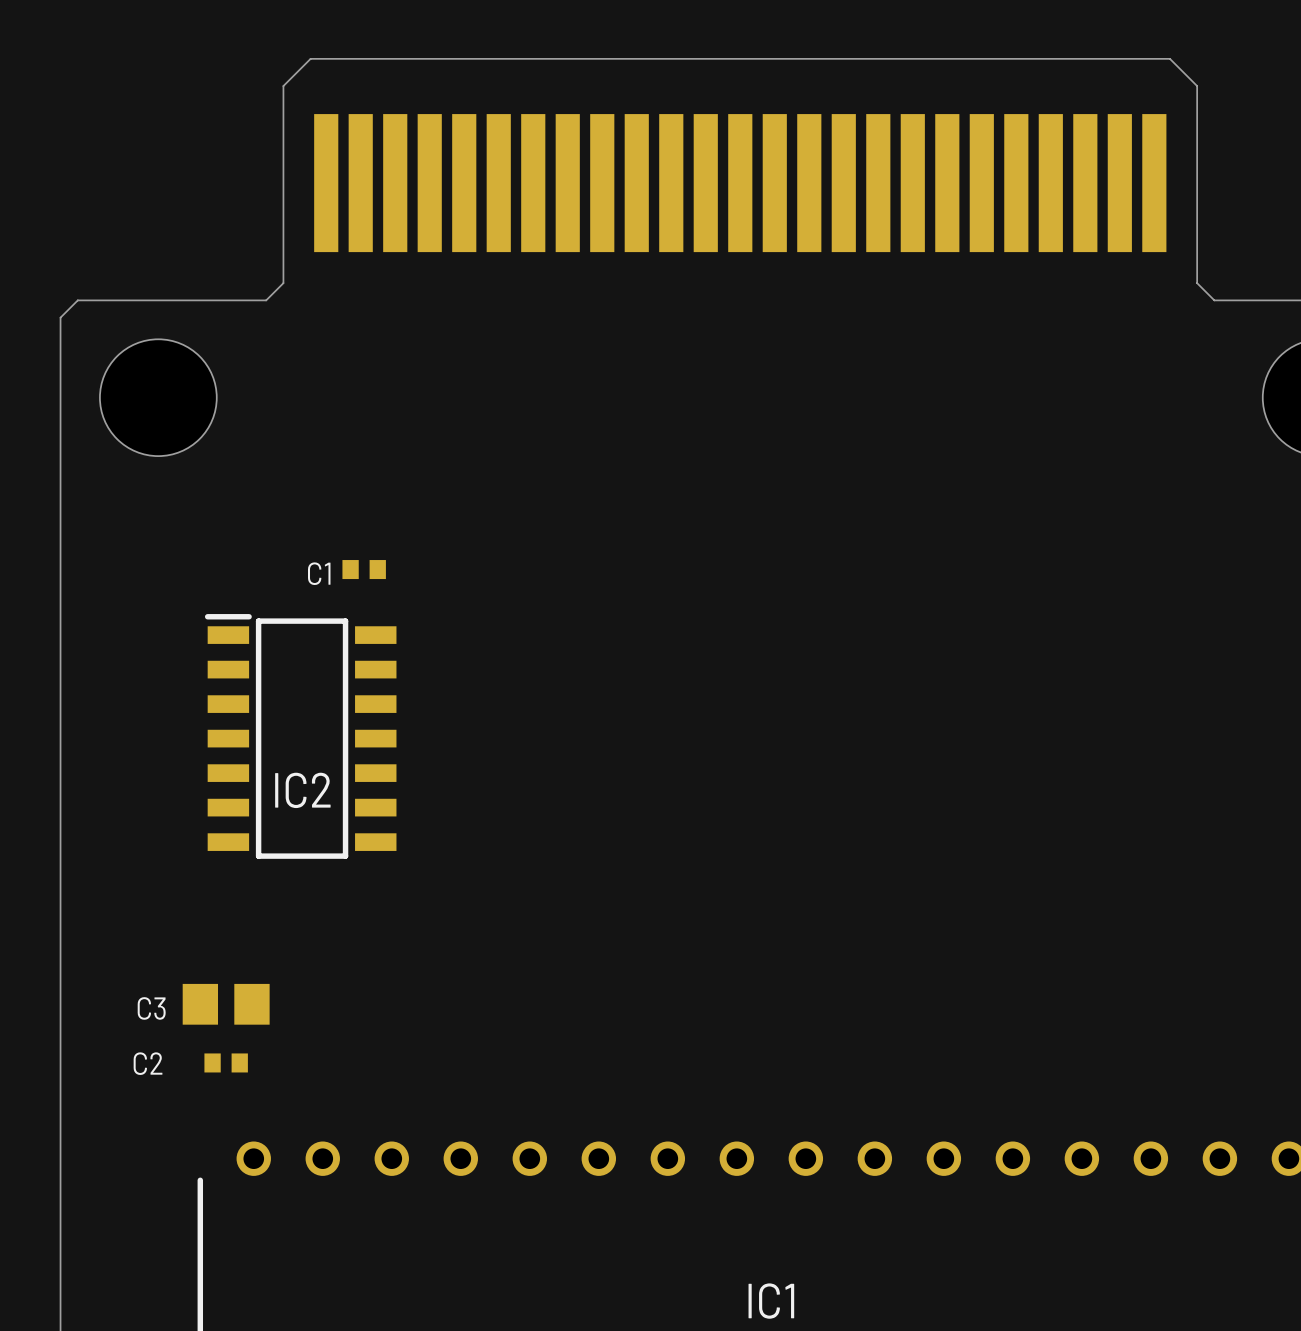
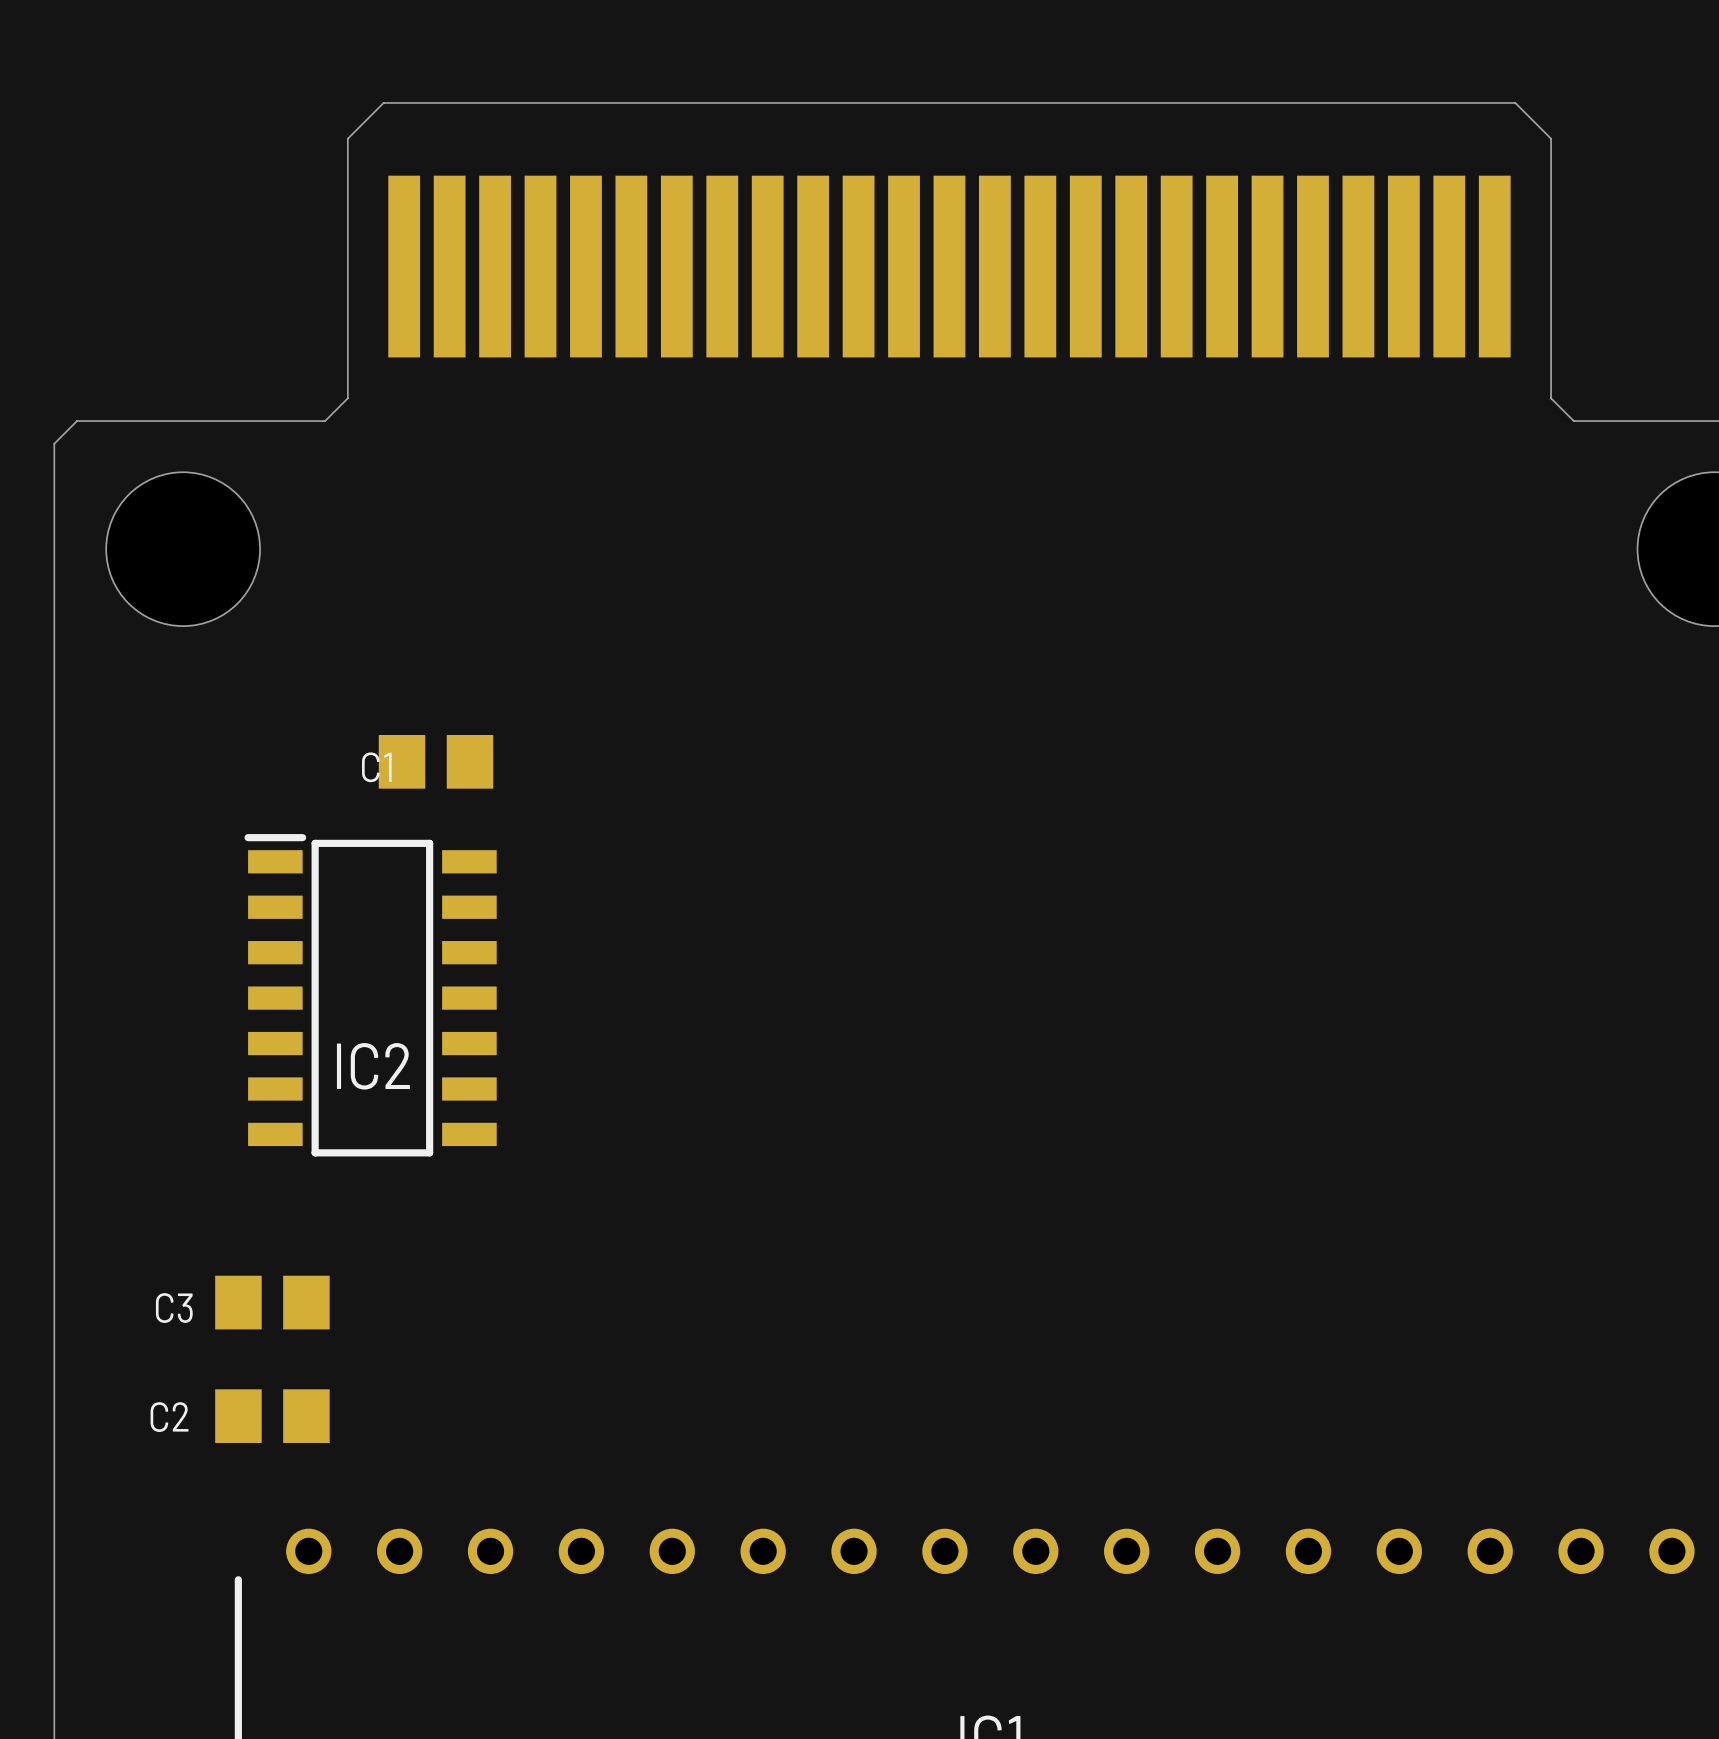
C1 footprint: [342, 560, 386, 580] -> [378, 734, 494, 789]
C3 position: (226, 1004) -> (272, 1302)
C2 footprint: [204, 1053, 248, 1073] -> [215, 1389, 330, 1443]

